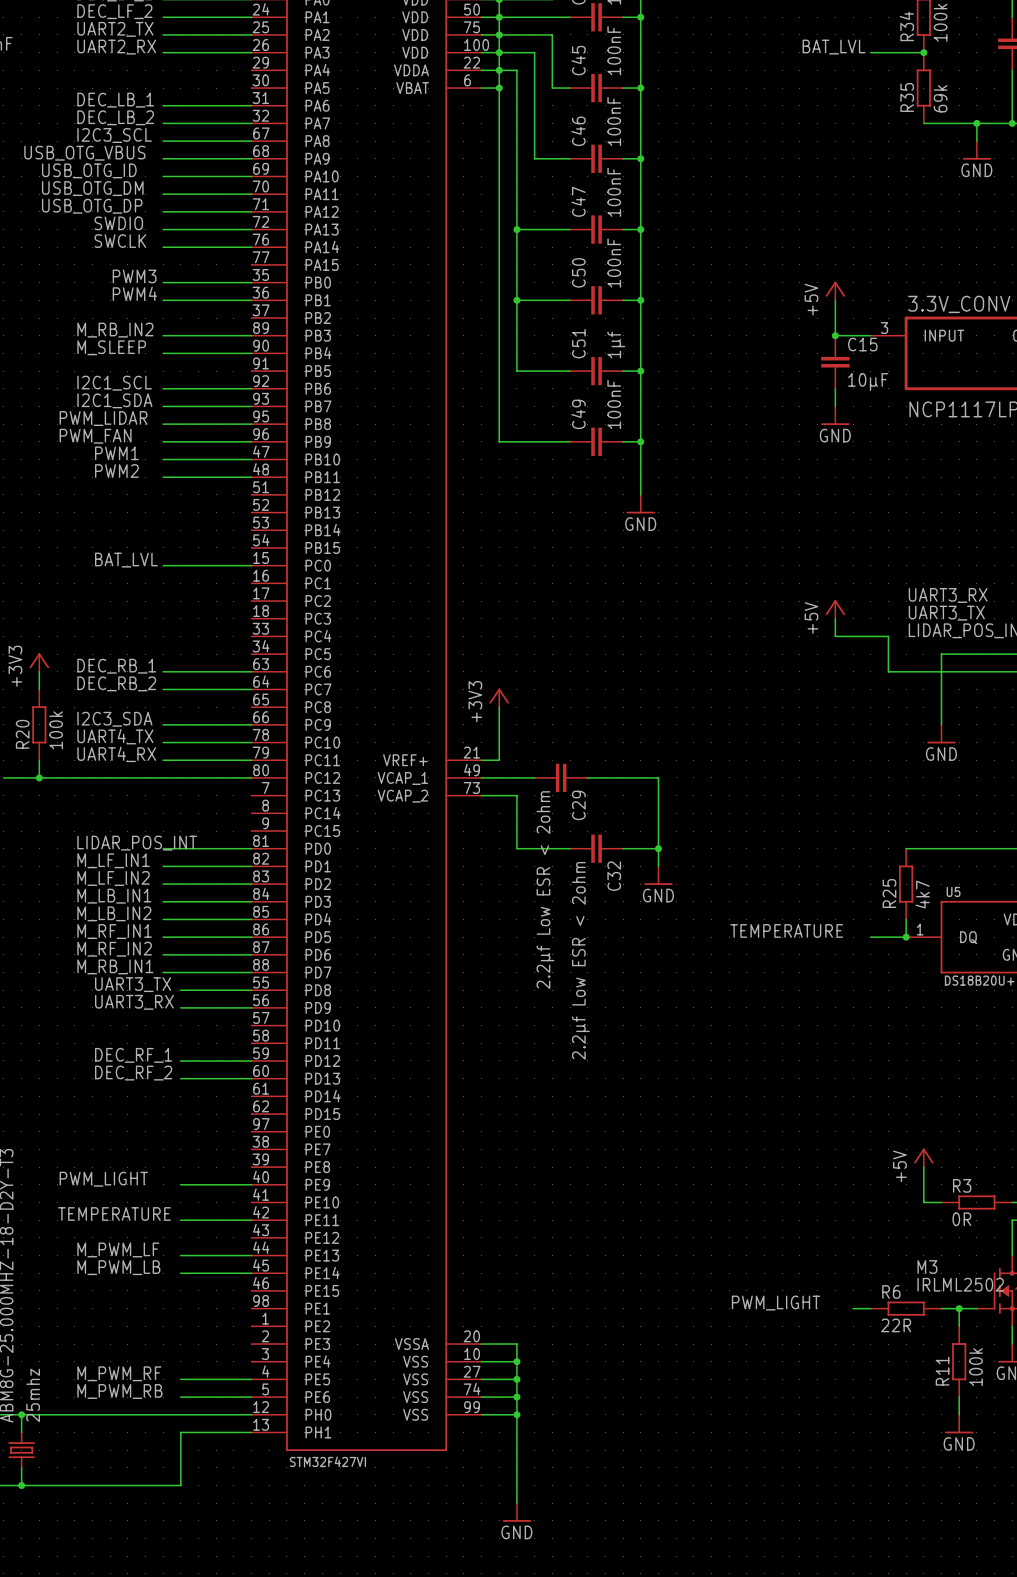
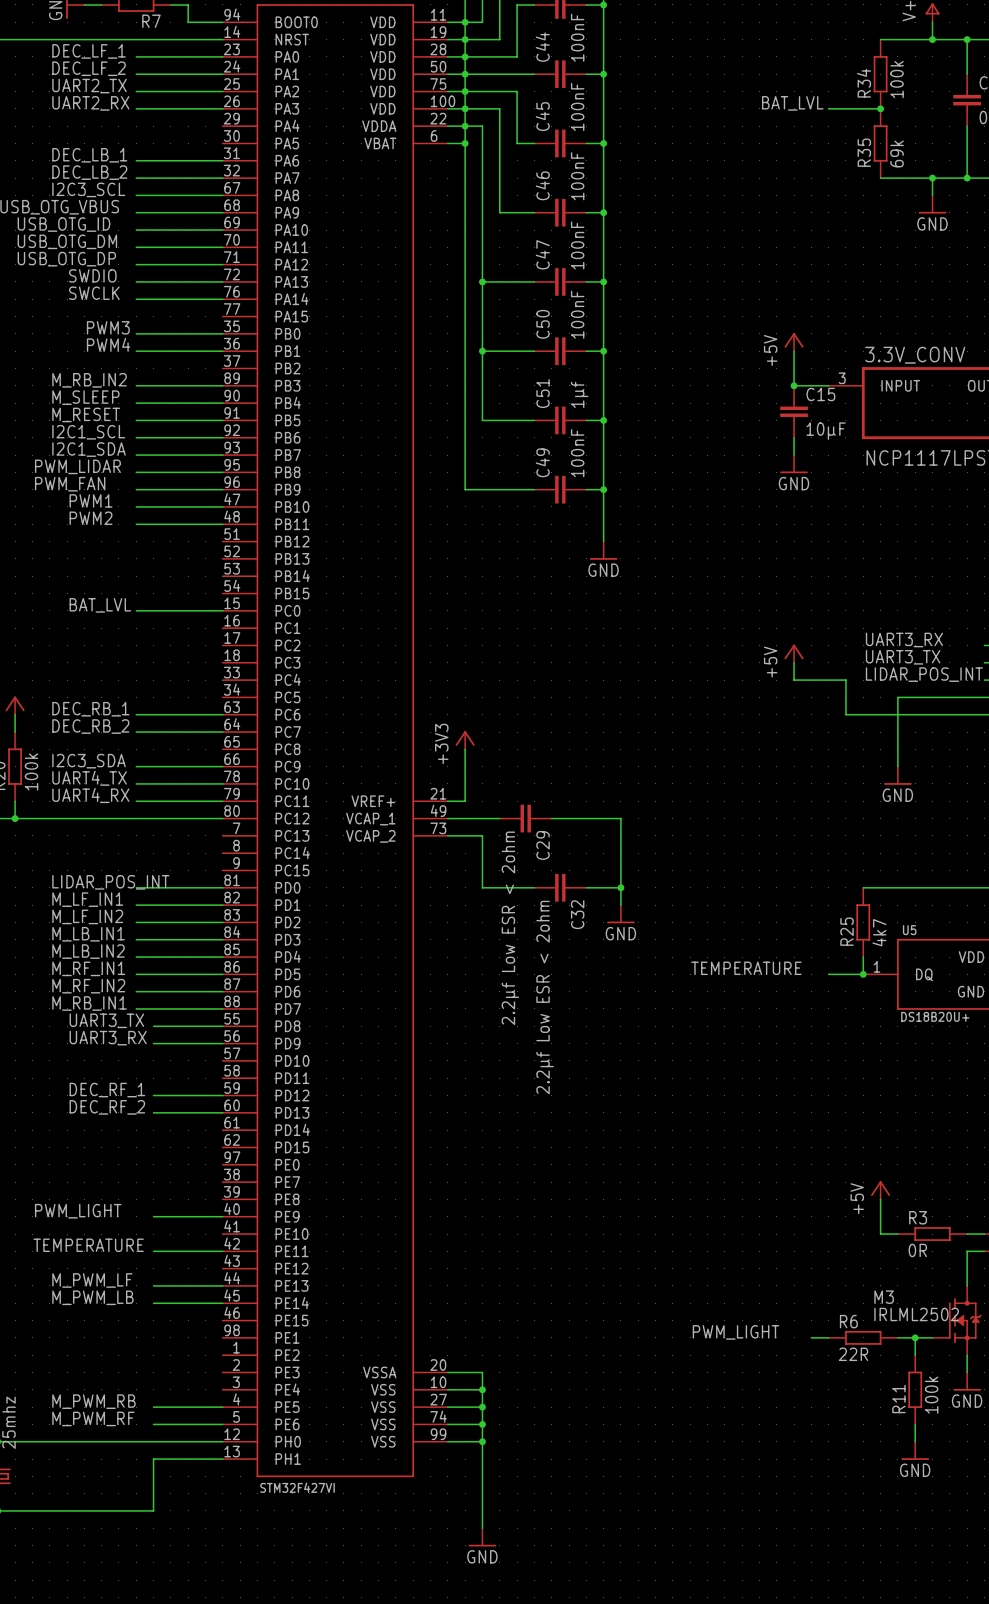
label: none -> M_RESET (86, 414)
wire: none -> (136, 420) (222, 420)
label: M_PWM_RF (119, 1373) -> M_PWM_RB (93, 1401)
label: M_PWM_RB (119, 1391) -> M_PWM_RF (93, 1418)

